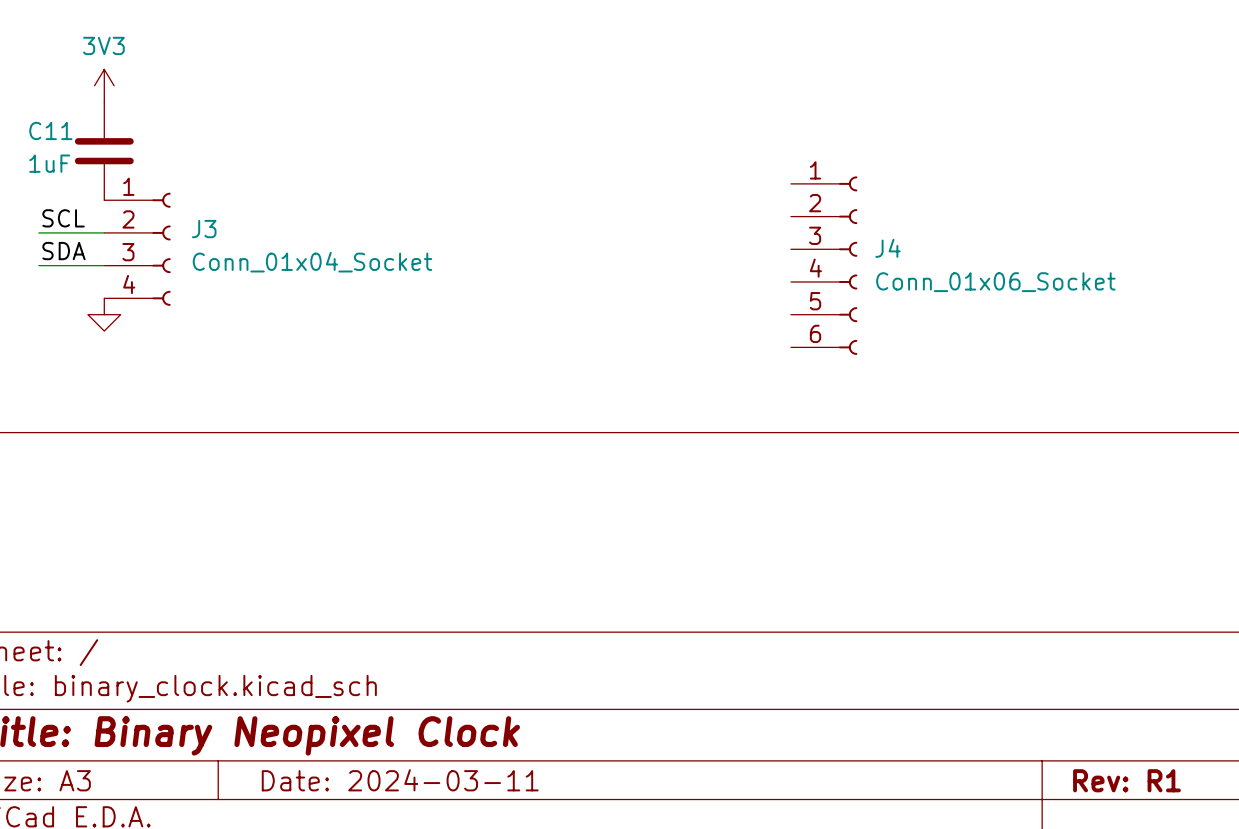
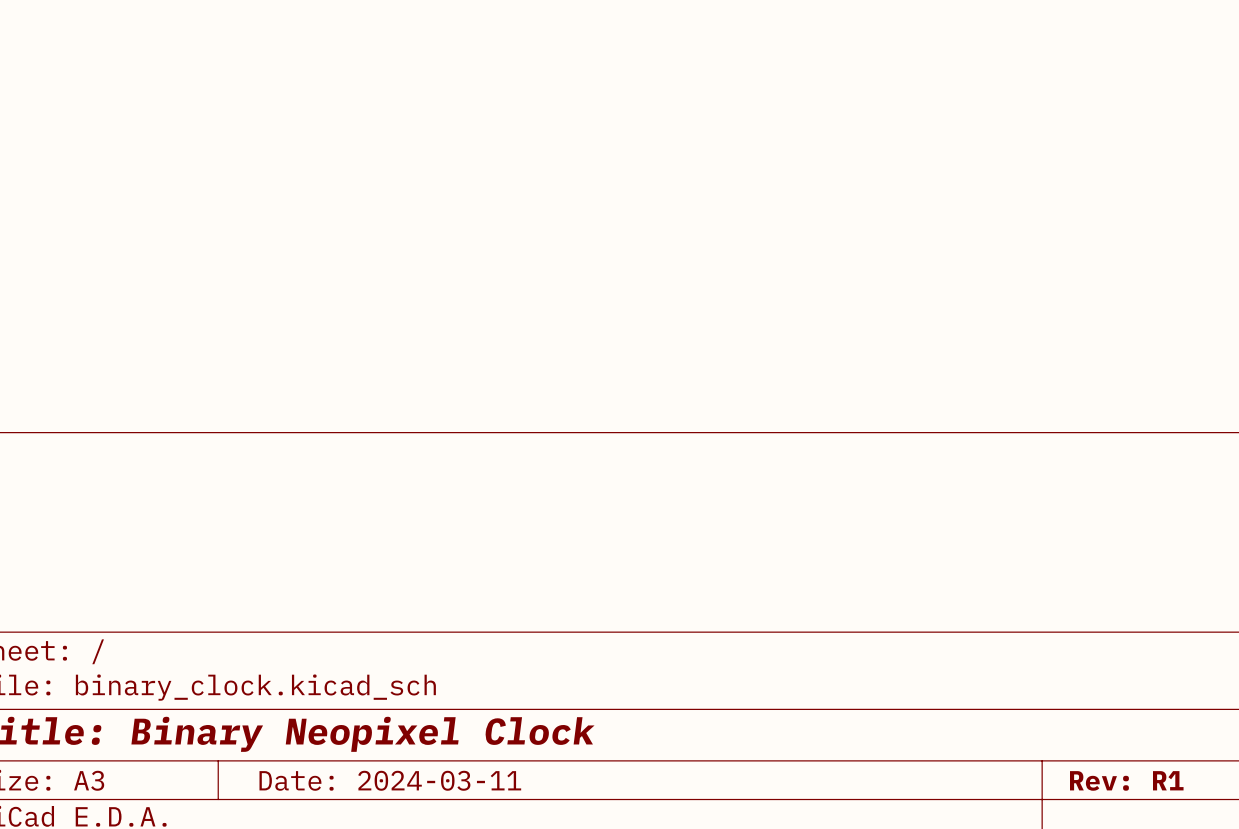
power symbol: 3V3 (104, 85) -> none
C11: 1uF (104, 151) -> none
label: SCL (63, 218) -> none
wire: (38, 232) (104, 232) -> none
J3: Conn_01x04_Socket (137, 249) -> none
label: SDA (63, 251) -> none
wire: (38, 265) (104, 265) -> none
J4: Conn_01x06_Socket (824, 265) -> none
power symbol: (104, 314) -> none

